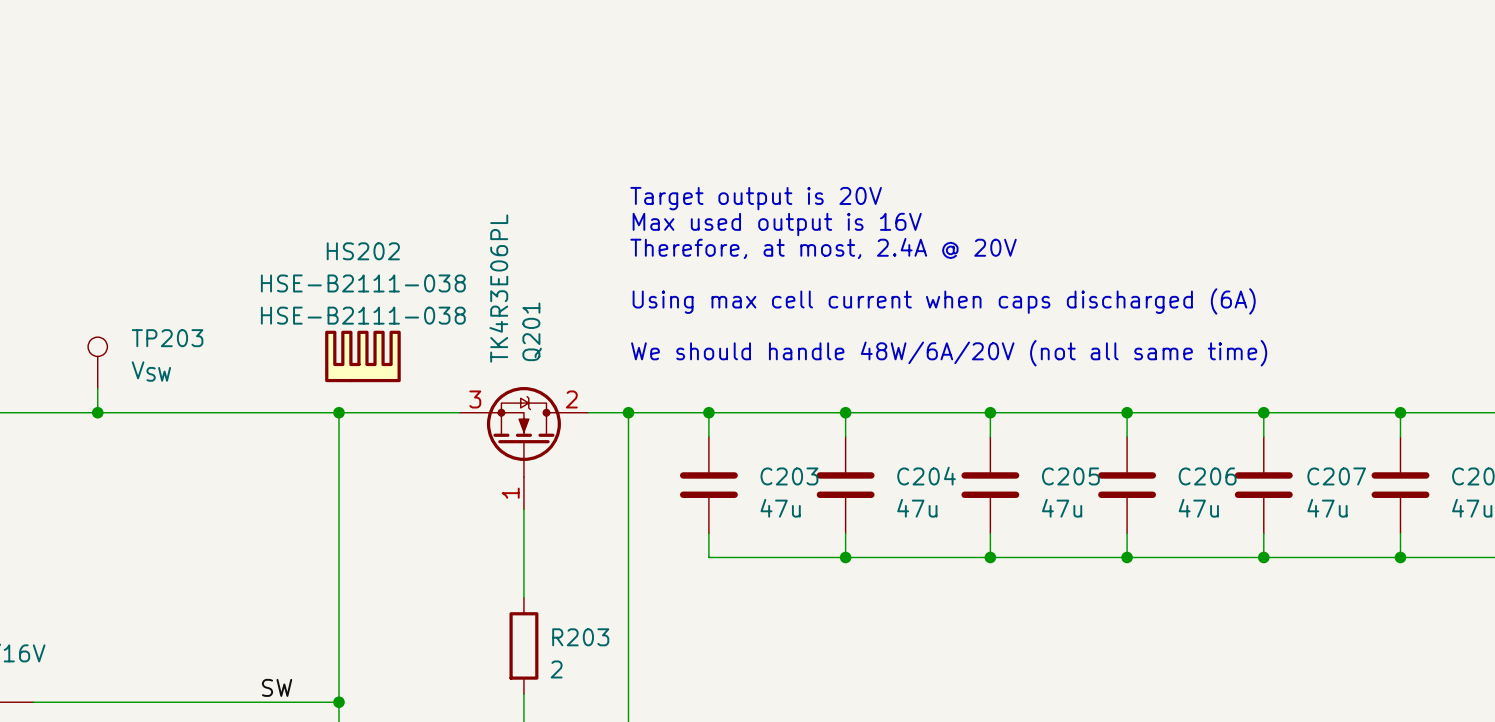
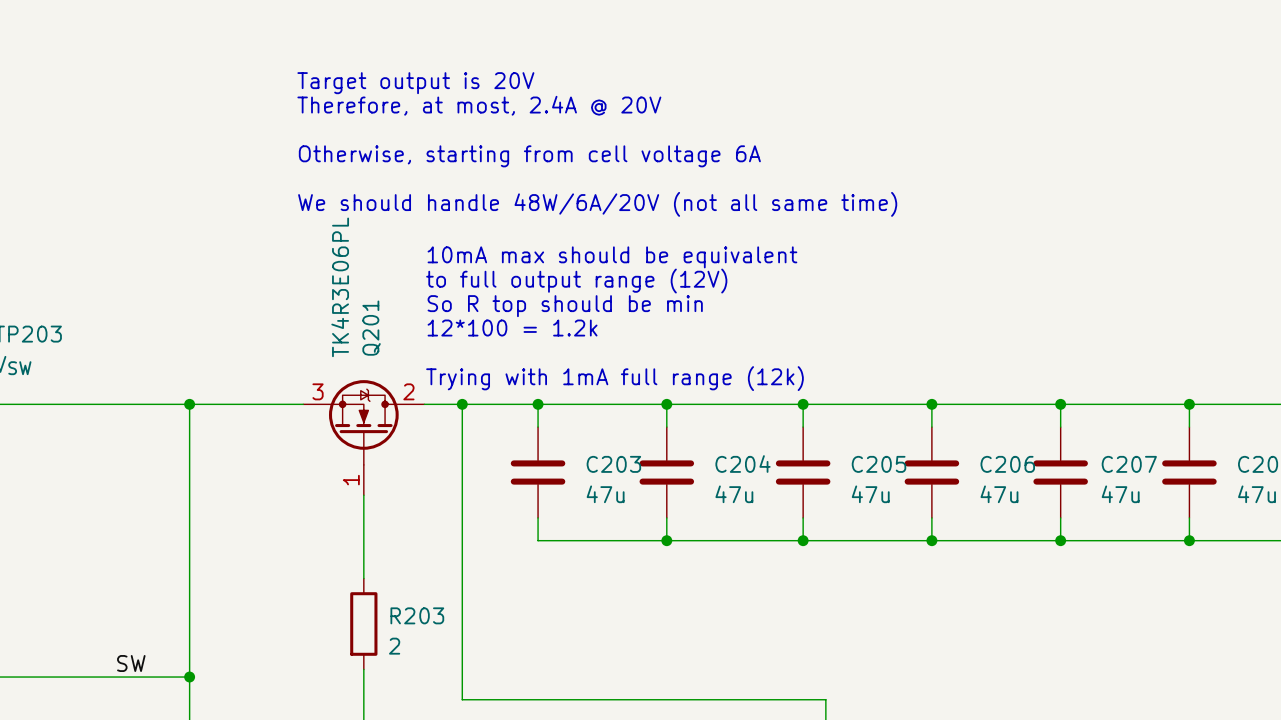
text: none -> Otherwise, starting from cell voltage 6A (529, 156)
text position: Target output is 20V (756, 198) -> Target output is 20V (415, 83)
text: Max used output is 16V (777, 224) -> none
text position: Therefore, at most, 2.4A @ 20V (823, 248) -> Therefore, at most, 2.4A @ 20V (479, 105)
text: none -> 10mA max should be equivalent (612, 257)
text: none -> to full output range (12V) (576, 281)
text: Using max cell current when caps discharged (6A) (944, 301) -> none
text: none -> So R top should be min (565, 306)
text: none -> 12*100 = 1.2k (512, 328)
text position: We should handle 48W/6A/20V (not all same time) (949, 353) -> We should handle 48W/6A/20V (not all same time) (597, 204)
HS202: HSE-B2111-038 (362, 356) -> none
text: none -> Trying with 1mA full range (12k) (614, 378)

